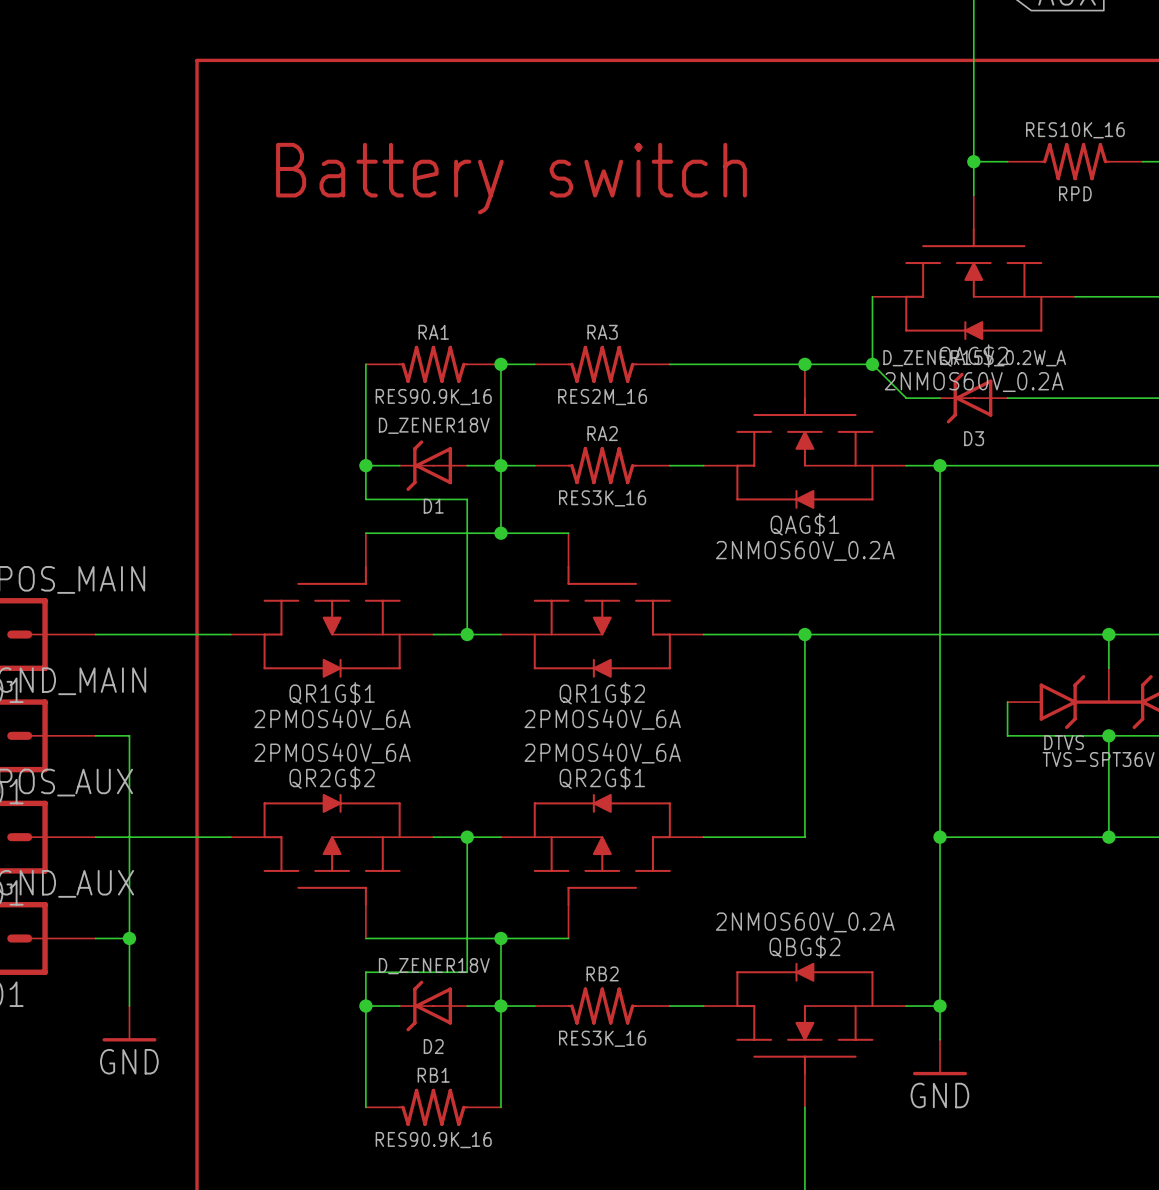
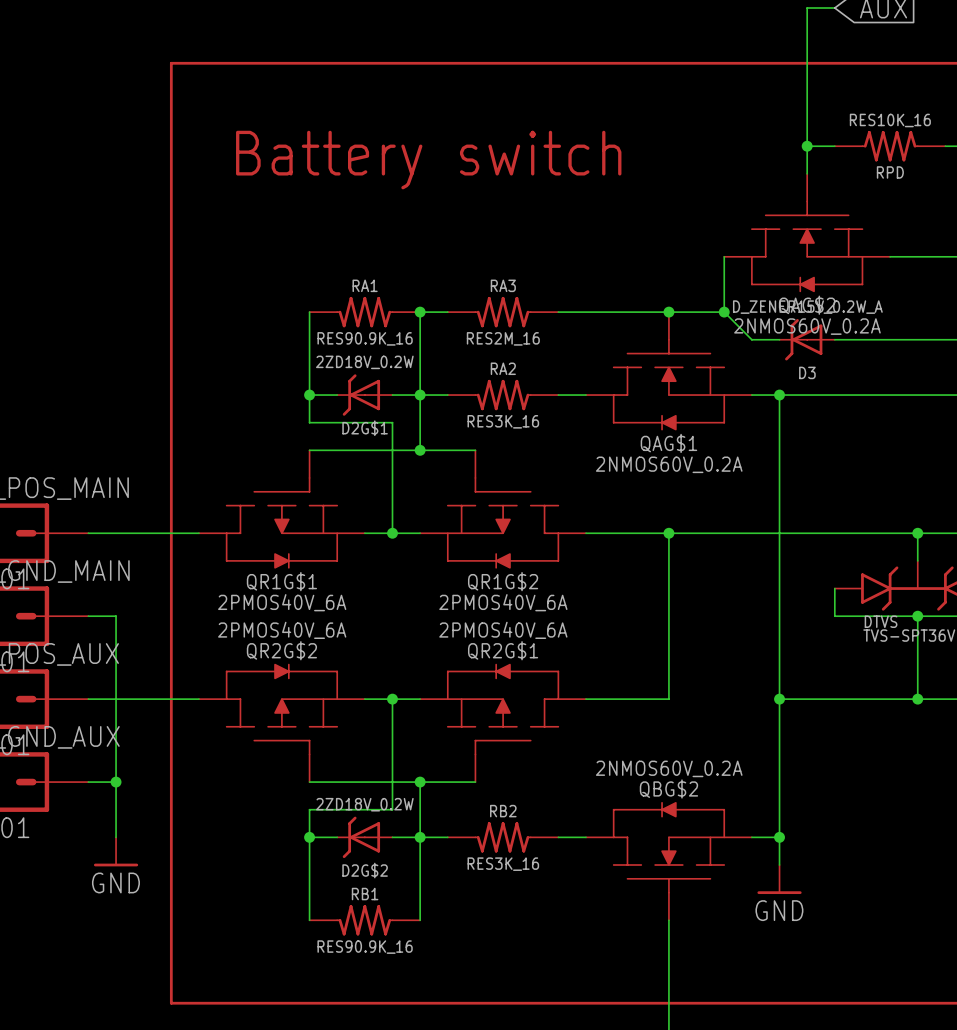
D1 value: D_ZENER18V (434, 425) -> 2ZD18V_0.2W (364, 362)
D1 name: D1 (433, 506) -> D2G$1 (365, 428)
D2 value: D_ZENER18V (434, 966) -> 2ZD18V_0.2W (364, 804)
D2 name: D2 (433, 1046) -> D2G$2 (365, 870)

